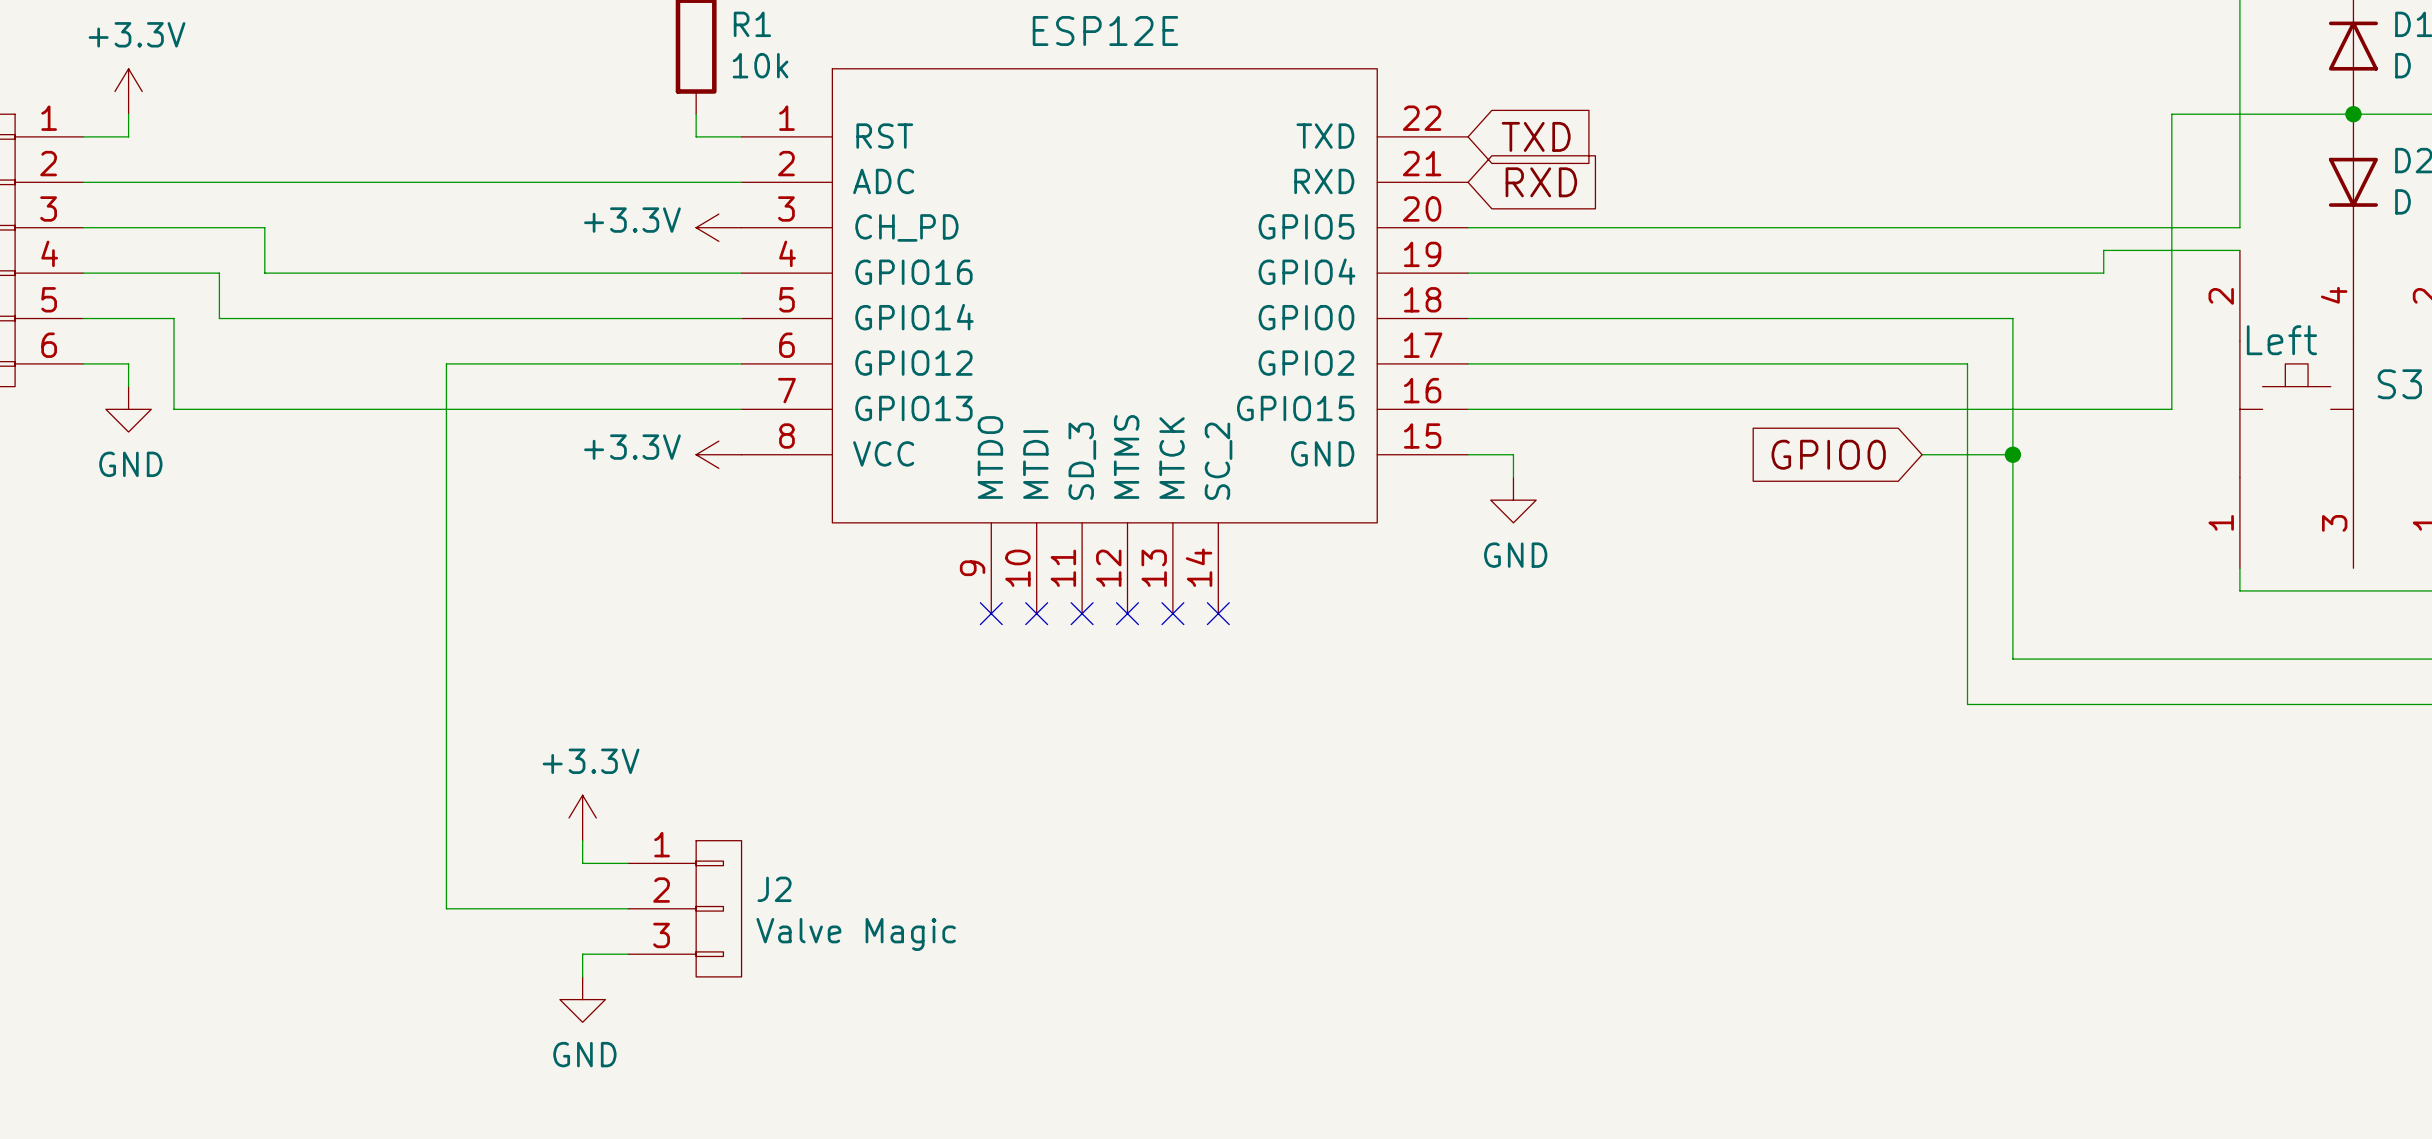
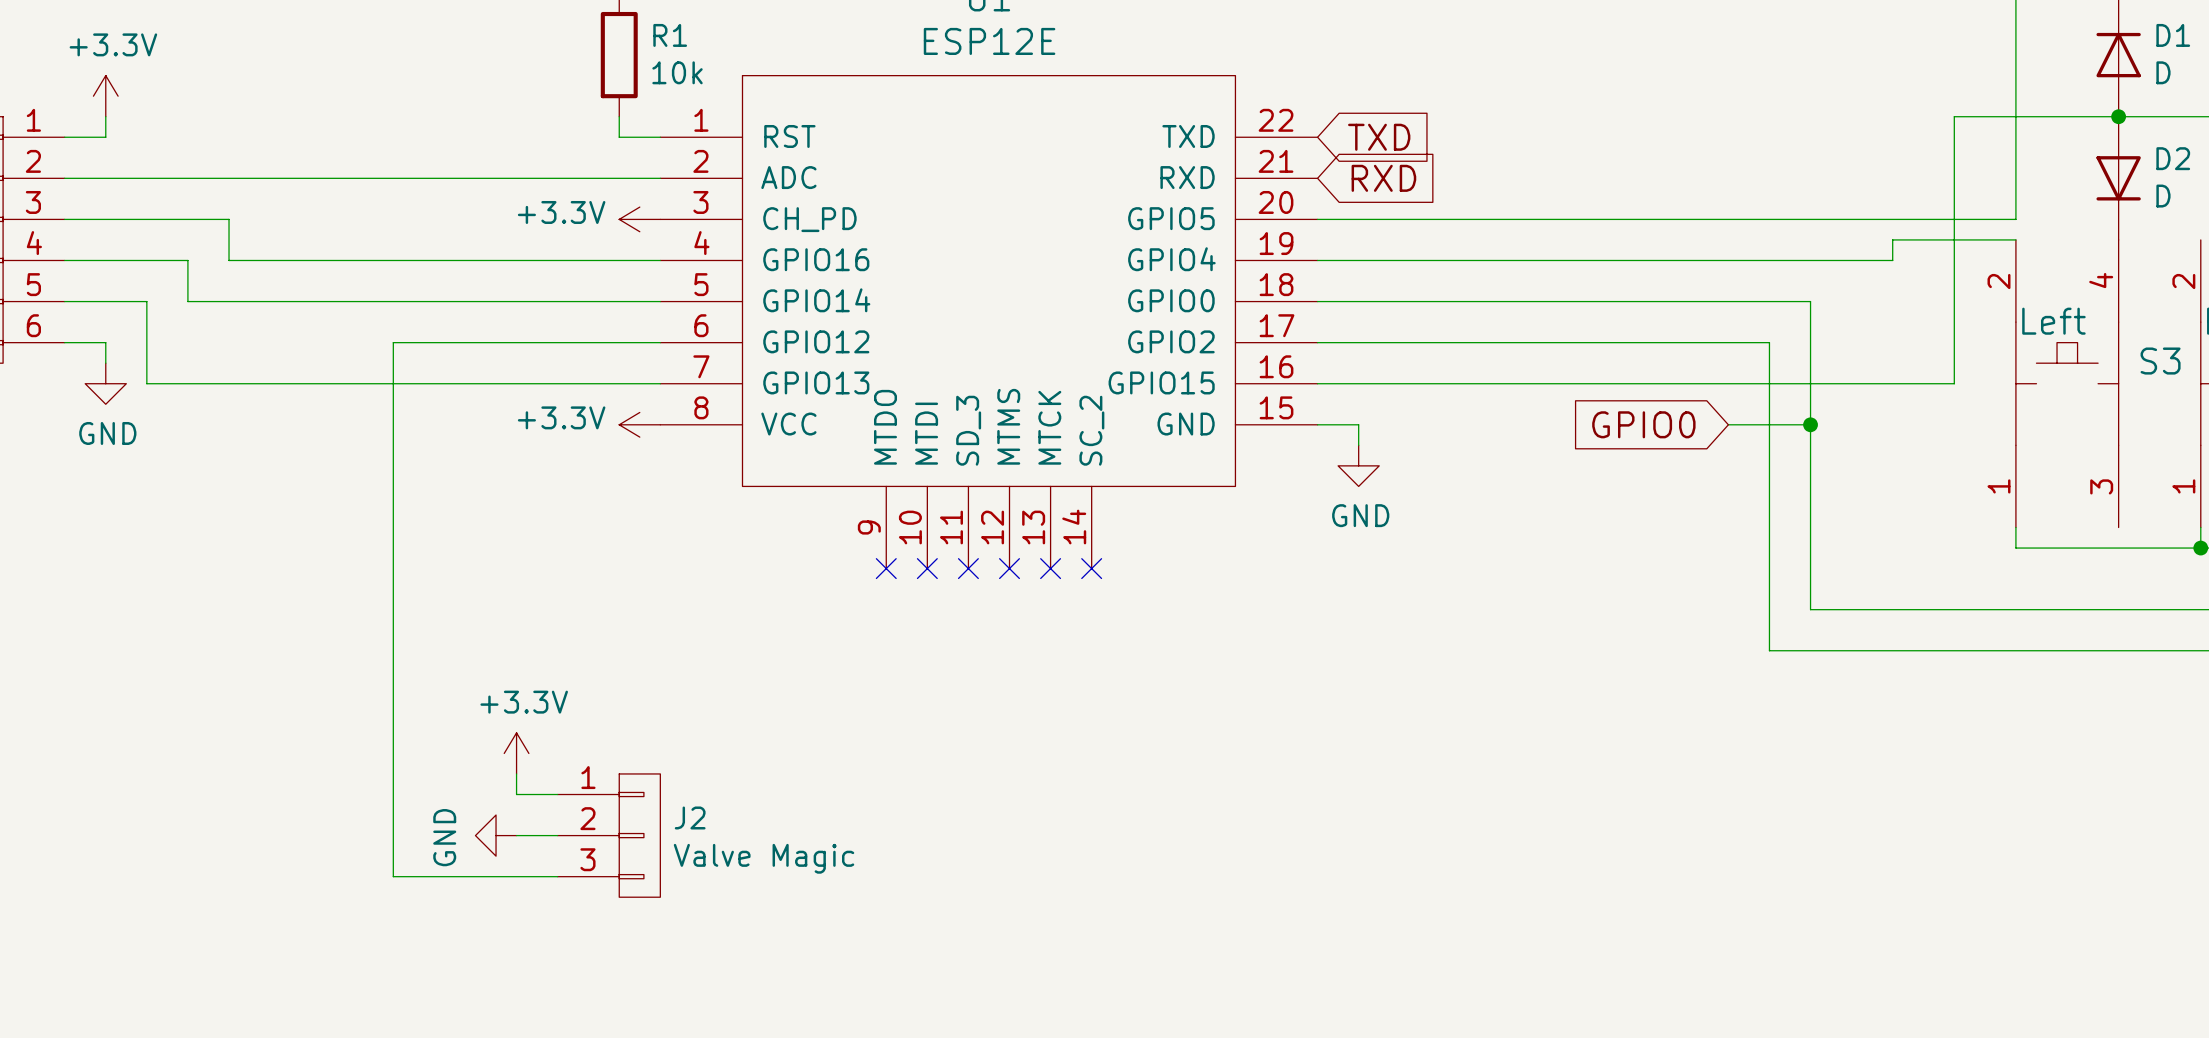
wire: (446, 908) (582, 908) -> (393, 835) (393, 876) (516, 876)
wire: (582, 954) (582, 976) -> none
power symbol rotation: 0° (582, 999) -> 90° clockwise (496, 835)
power symbol position: GND (582, 999) -> GND (496, 835)

